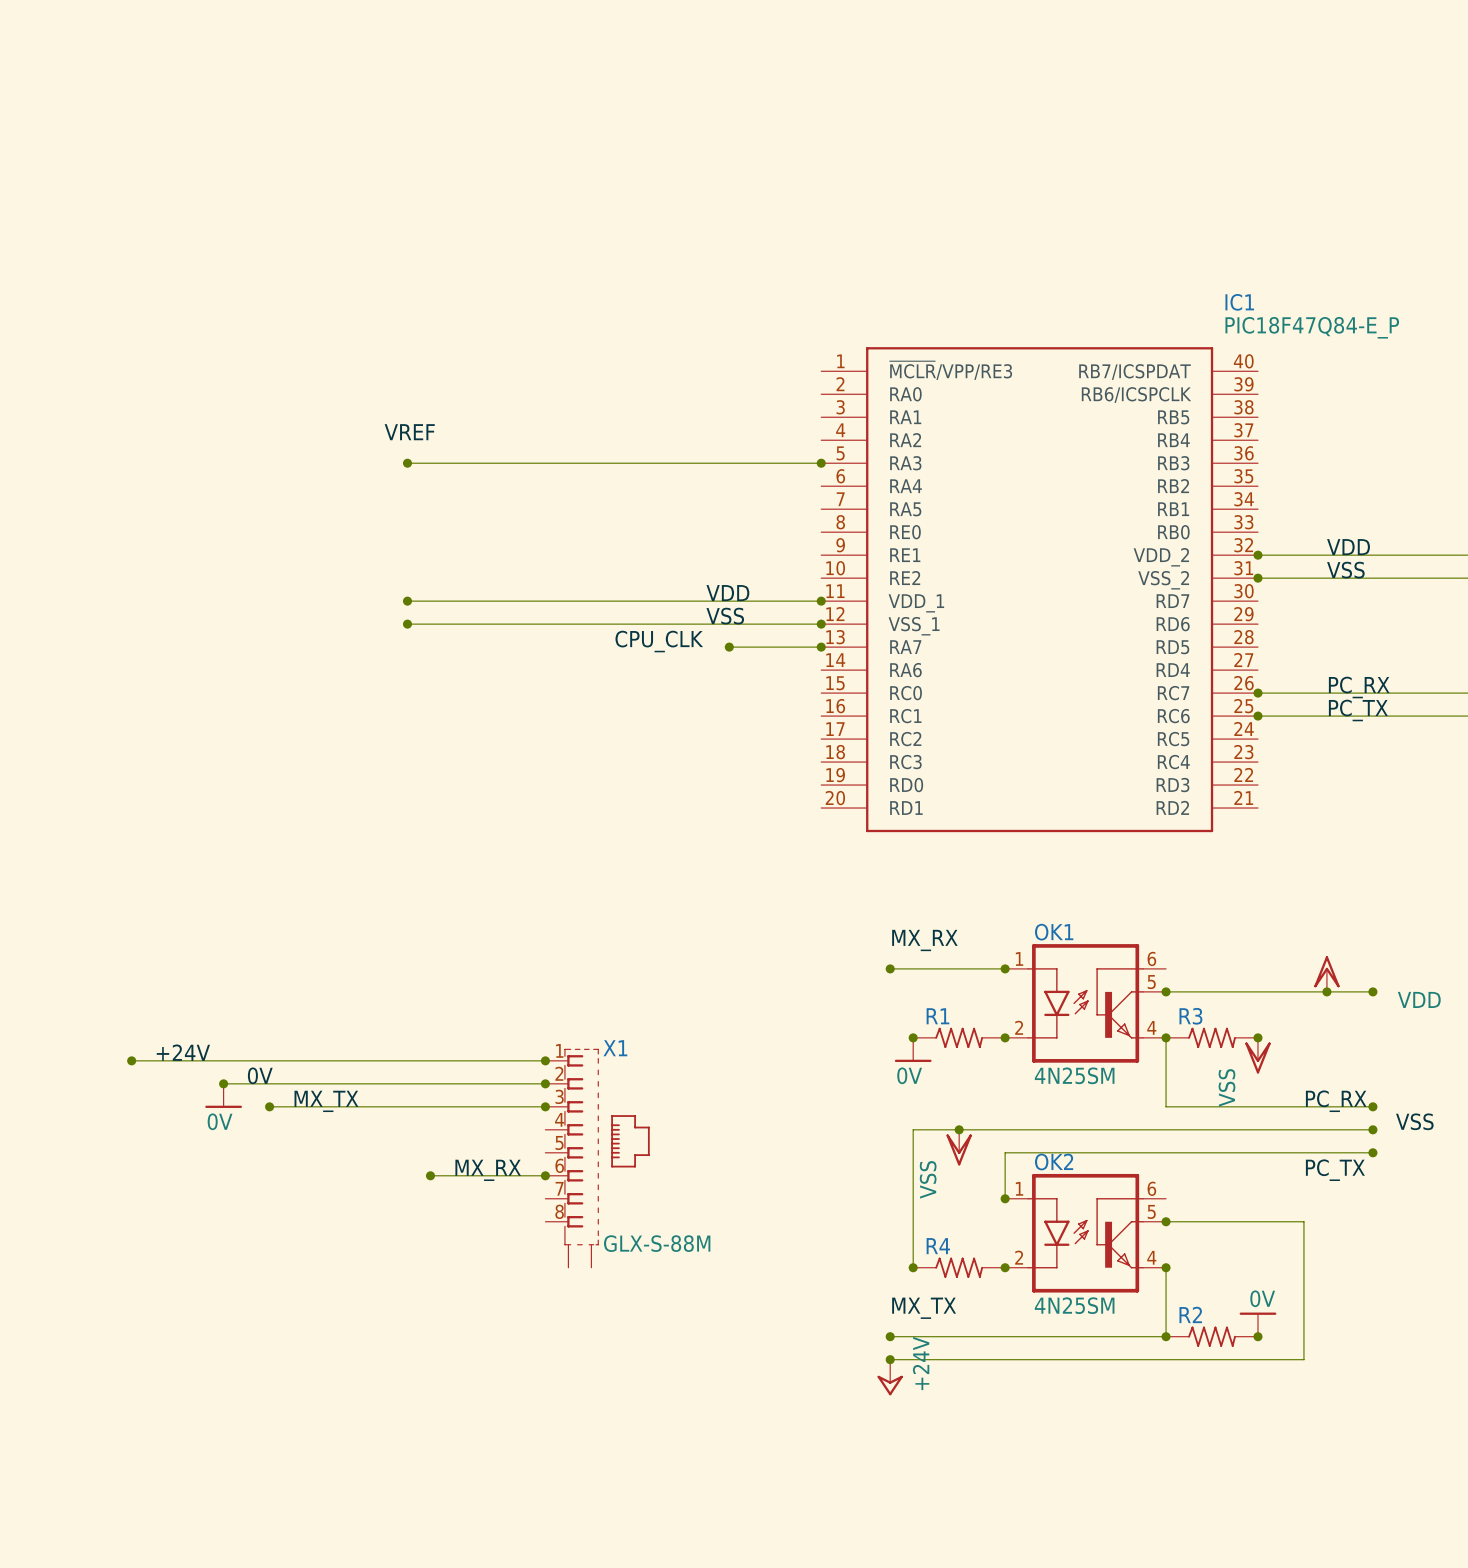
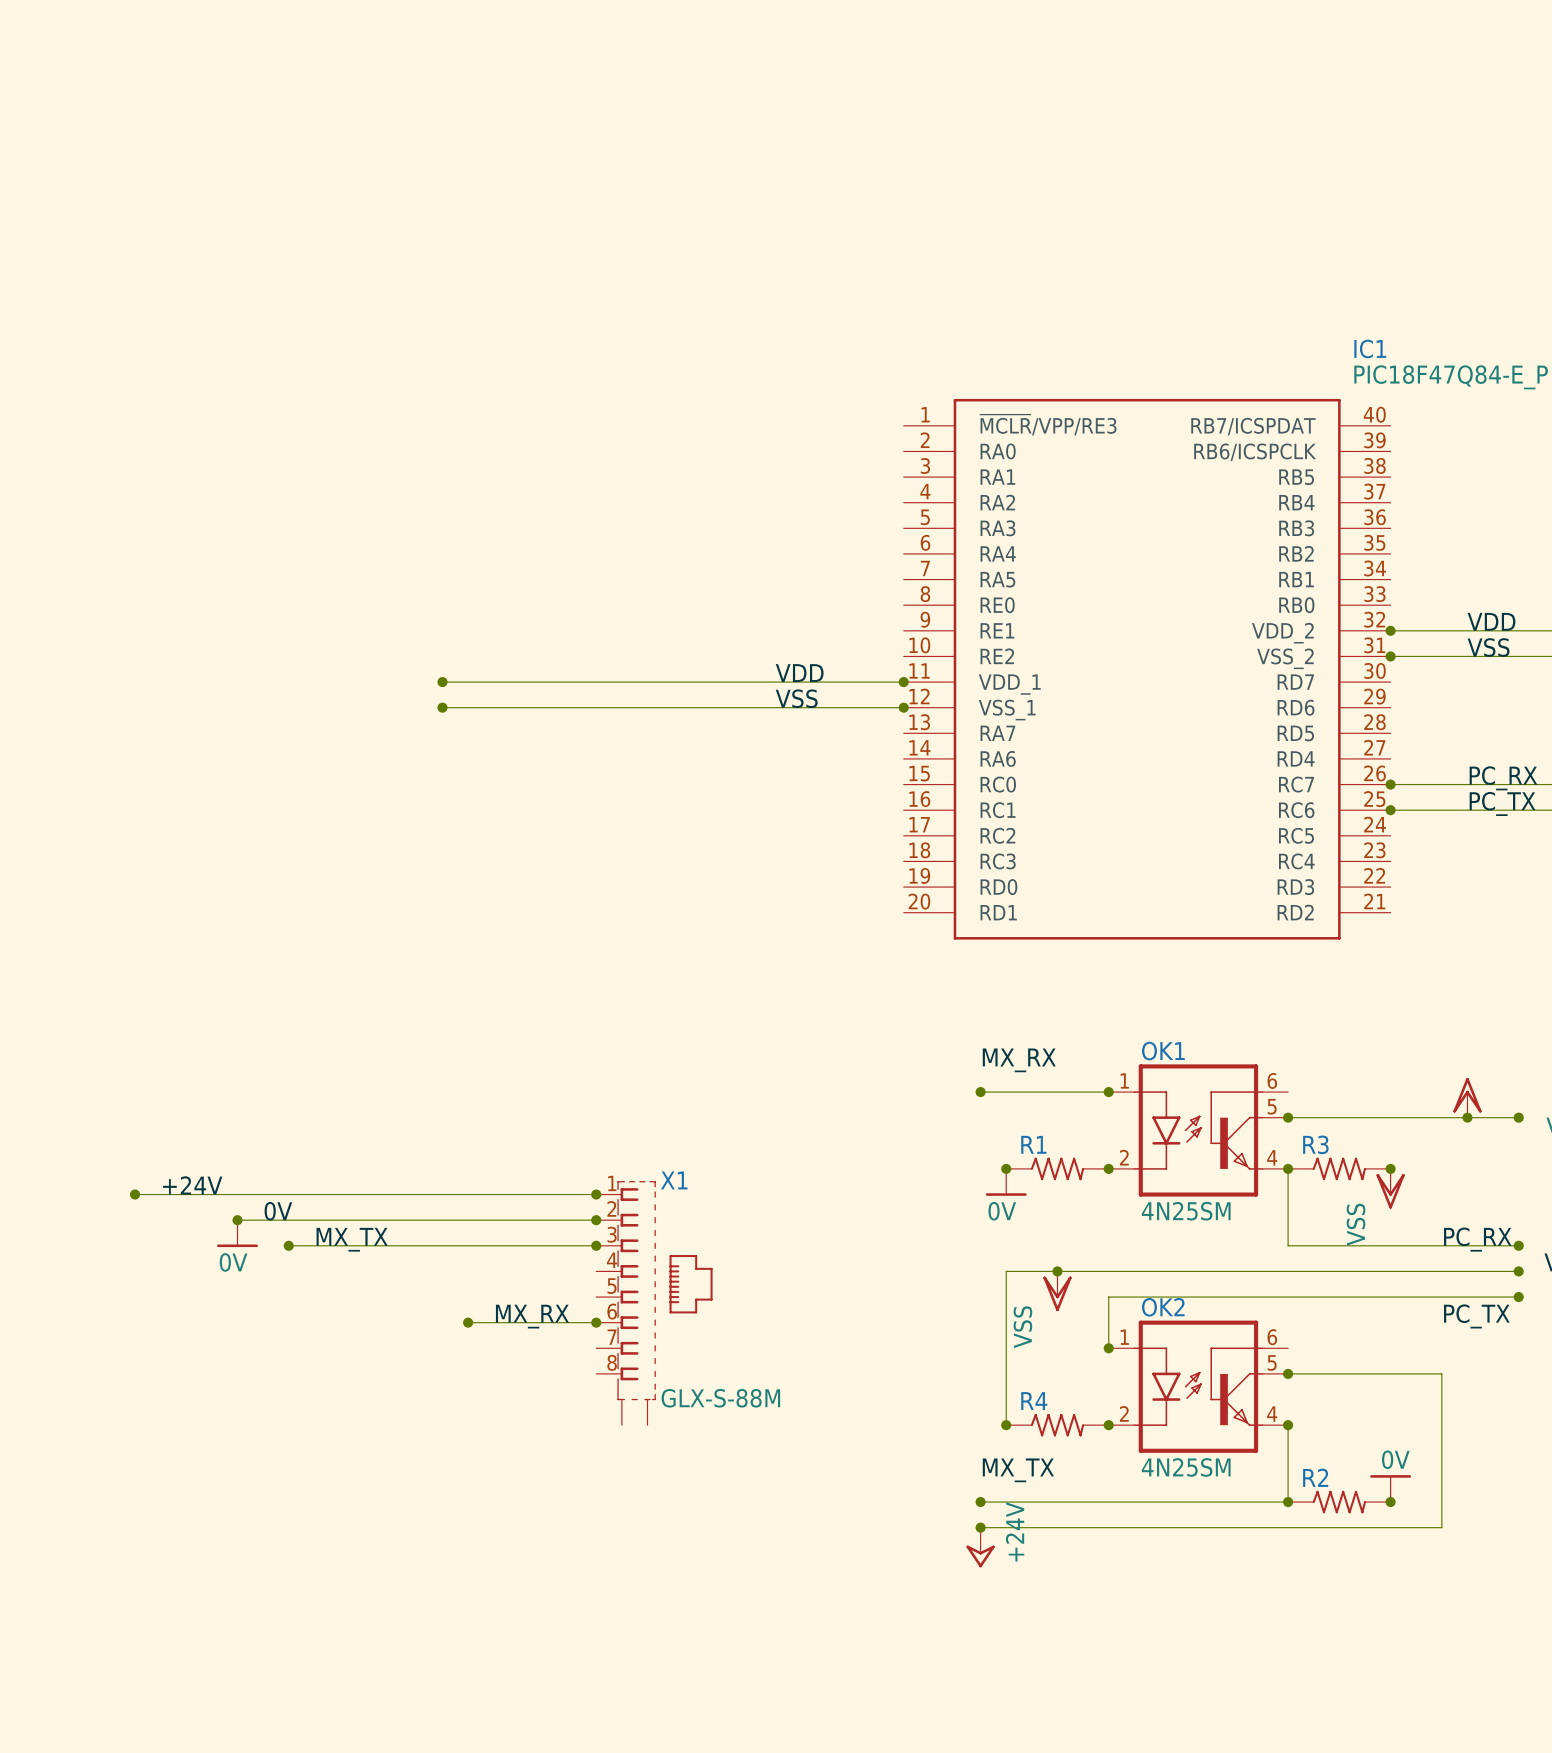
label: VREF (409, 432) -> none
wire: (407, 463) (821, 463) -> none
junction: (407, 463) -> none
junction: (821, 463) -> none
label: CPU_CLK (659, 641) -> none
wire: (729, 647) (821, 647) -> none
junction: (729, 647) -> none
junction: (821, 647) -> none

